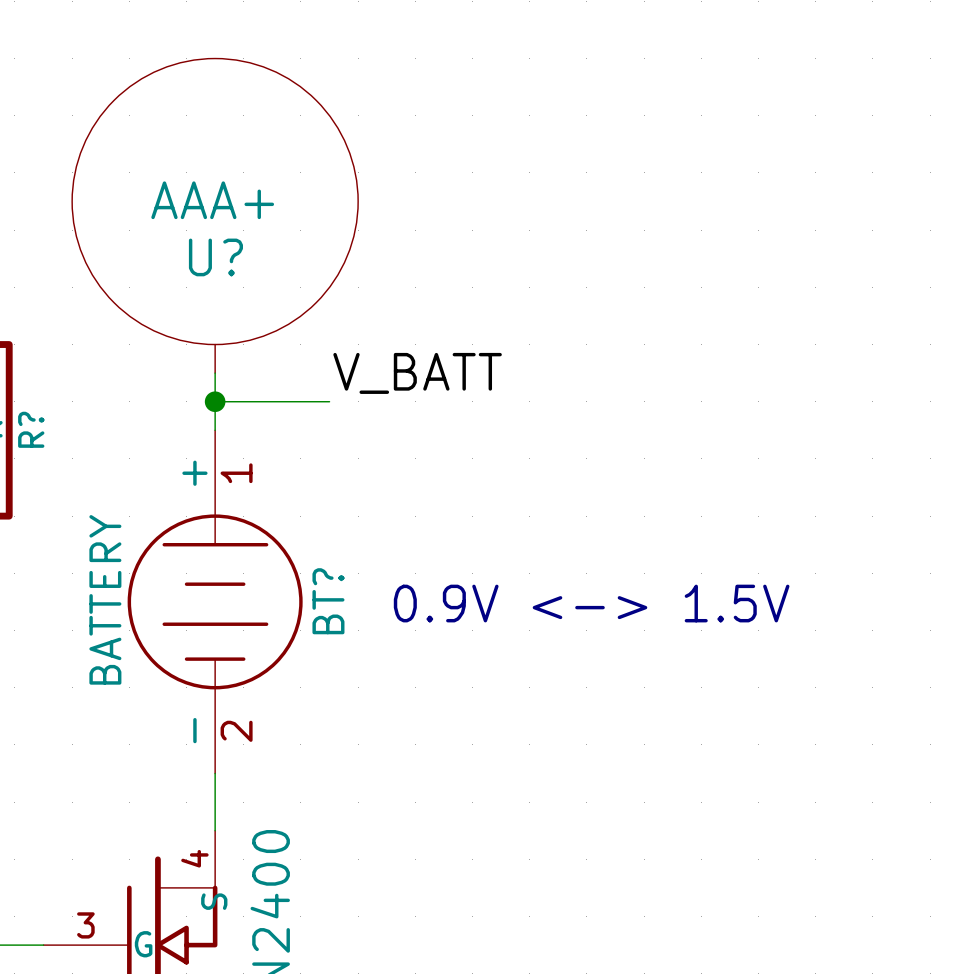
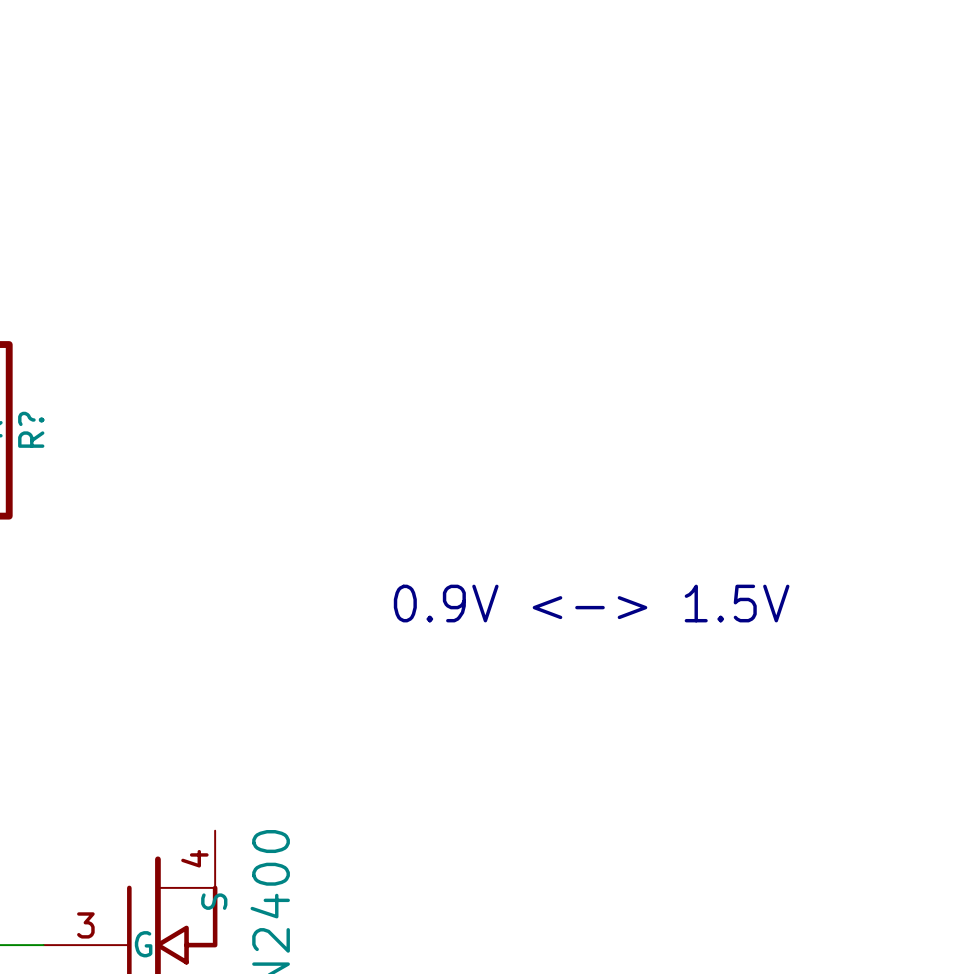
U?: AAA+ (215, 215) -> none
wire: (215, 373) (215, 430) -> none
label: V_BATT (417, 373) -> none
wire: (215, 401) (329, 401) -> none
junction: (215, 401) -> none
BT?: BATTERY (215, 601) -> none
wire: (215, 773) (215, 830) -> none

